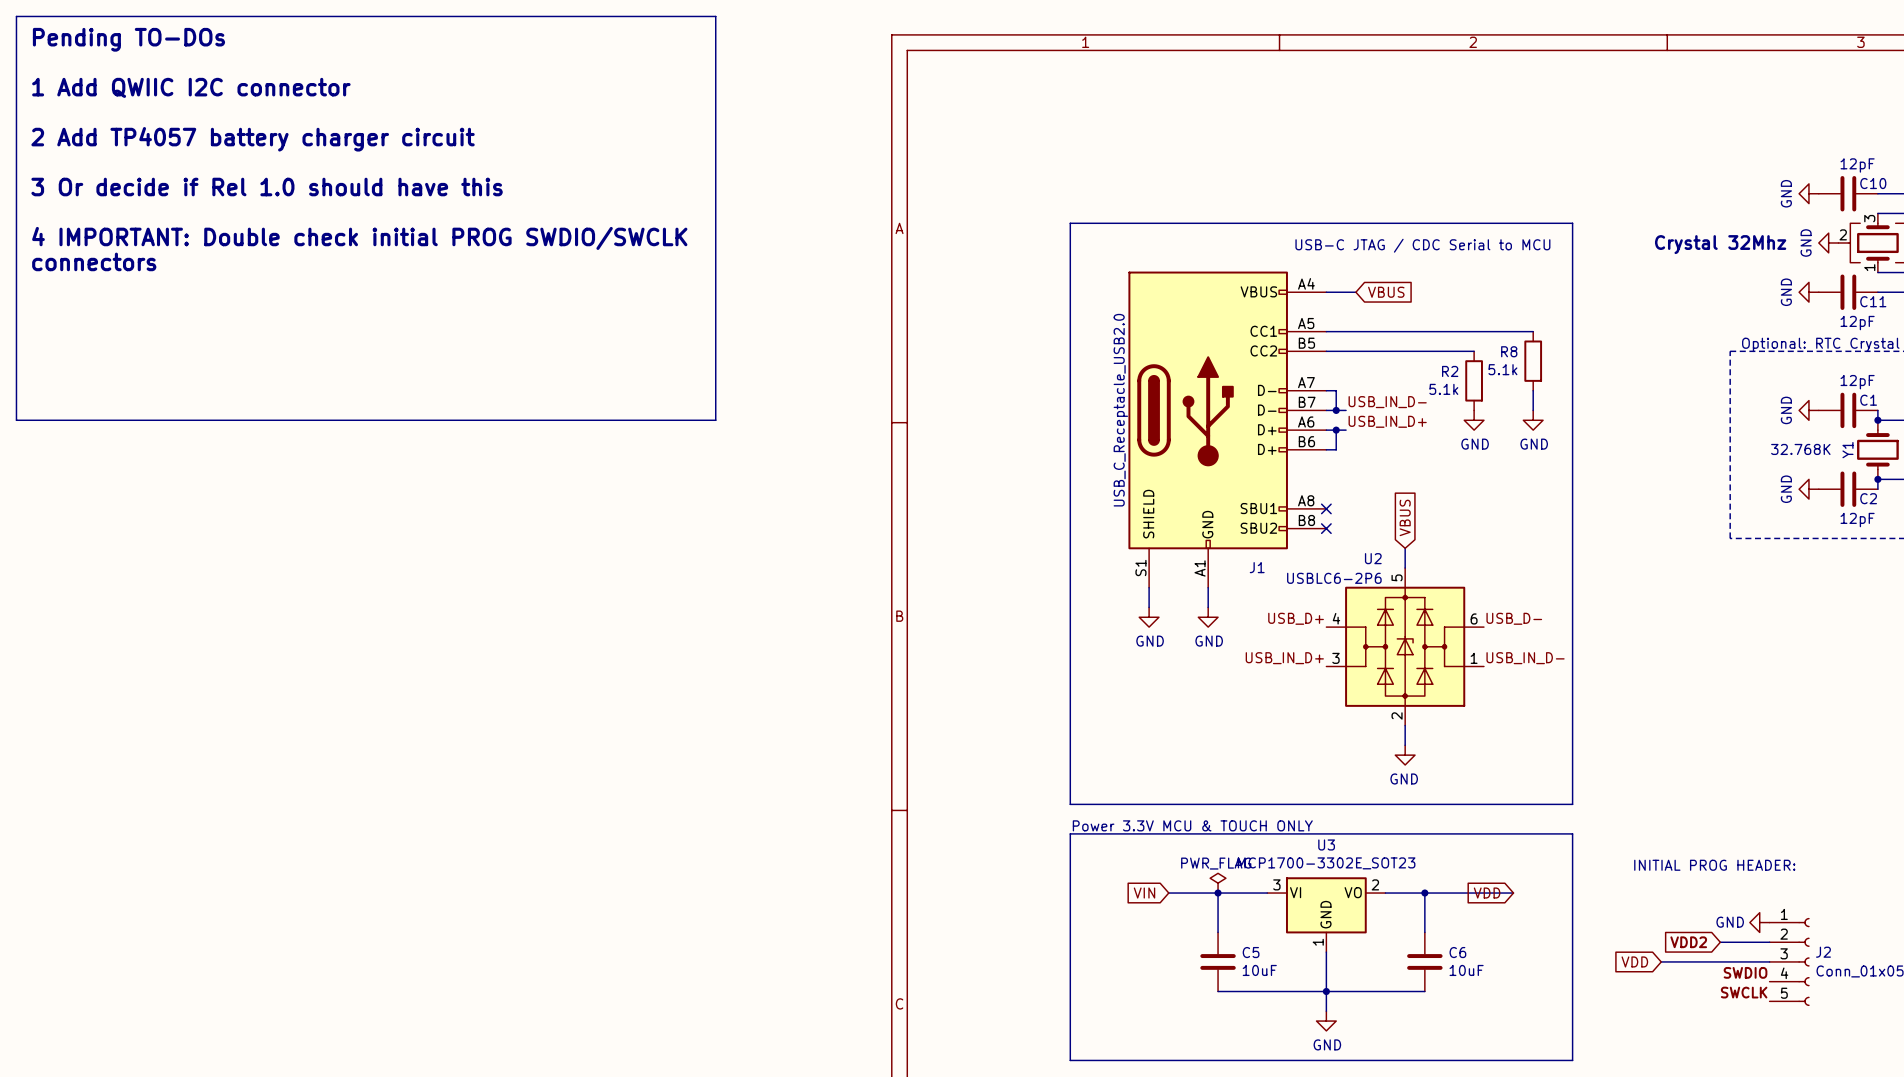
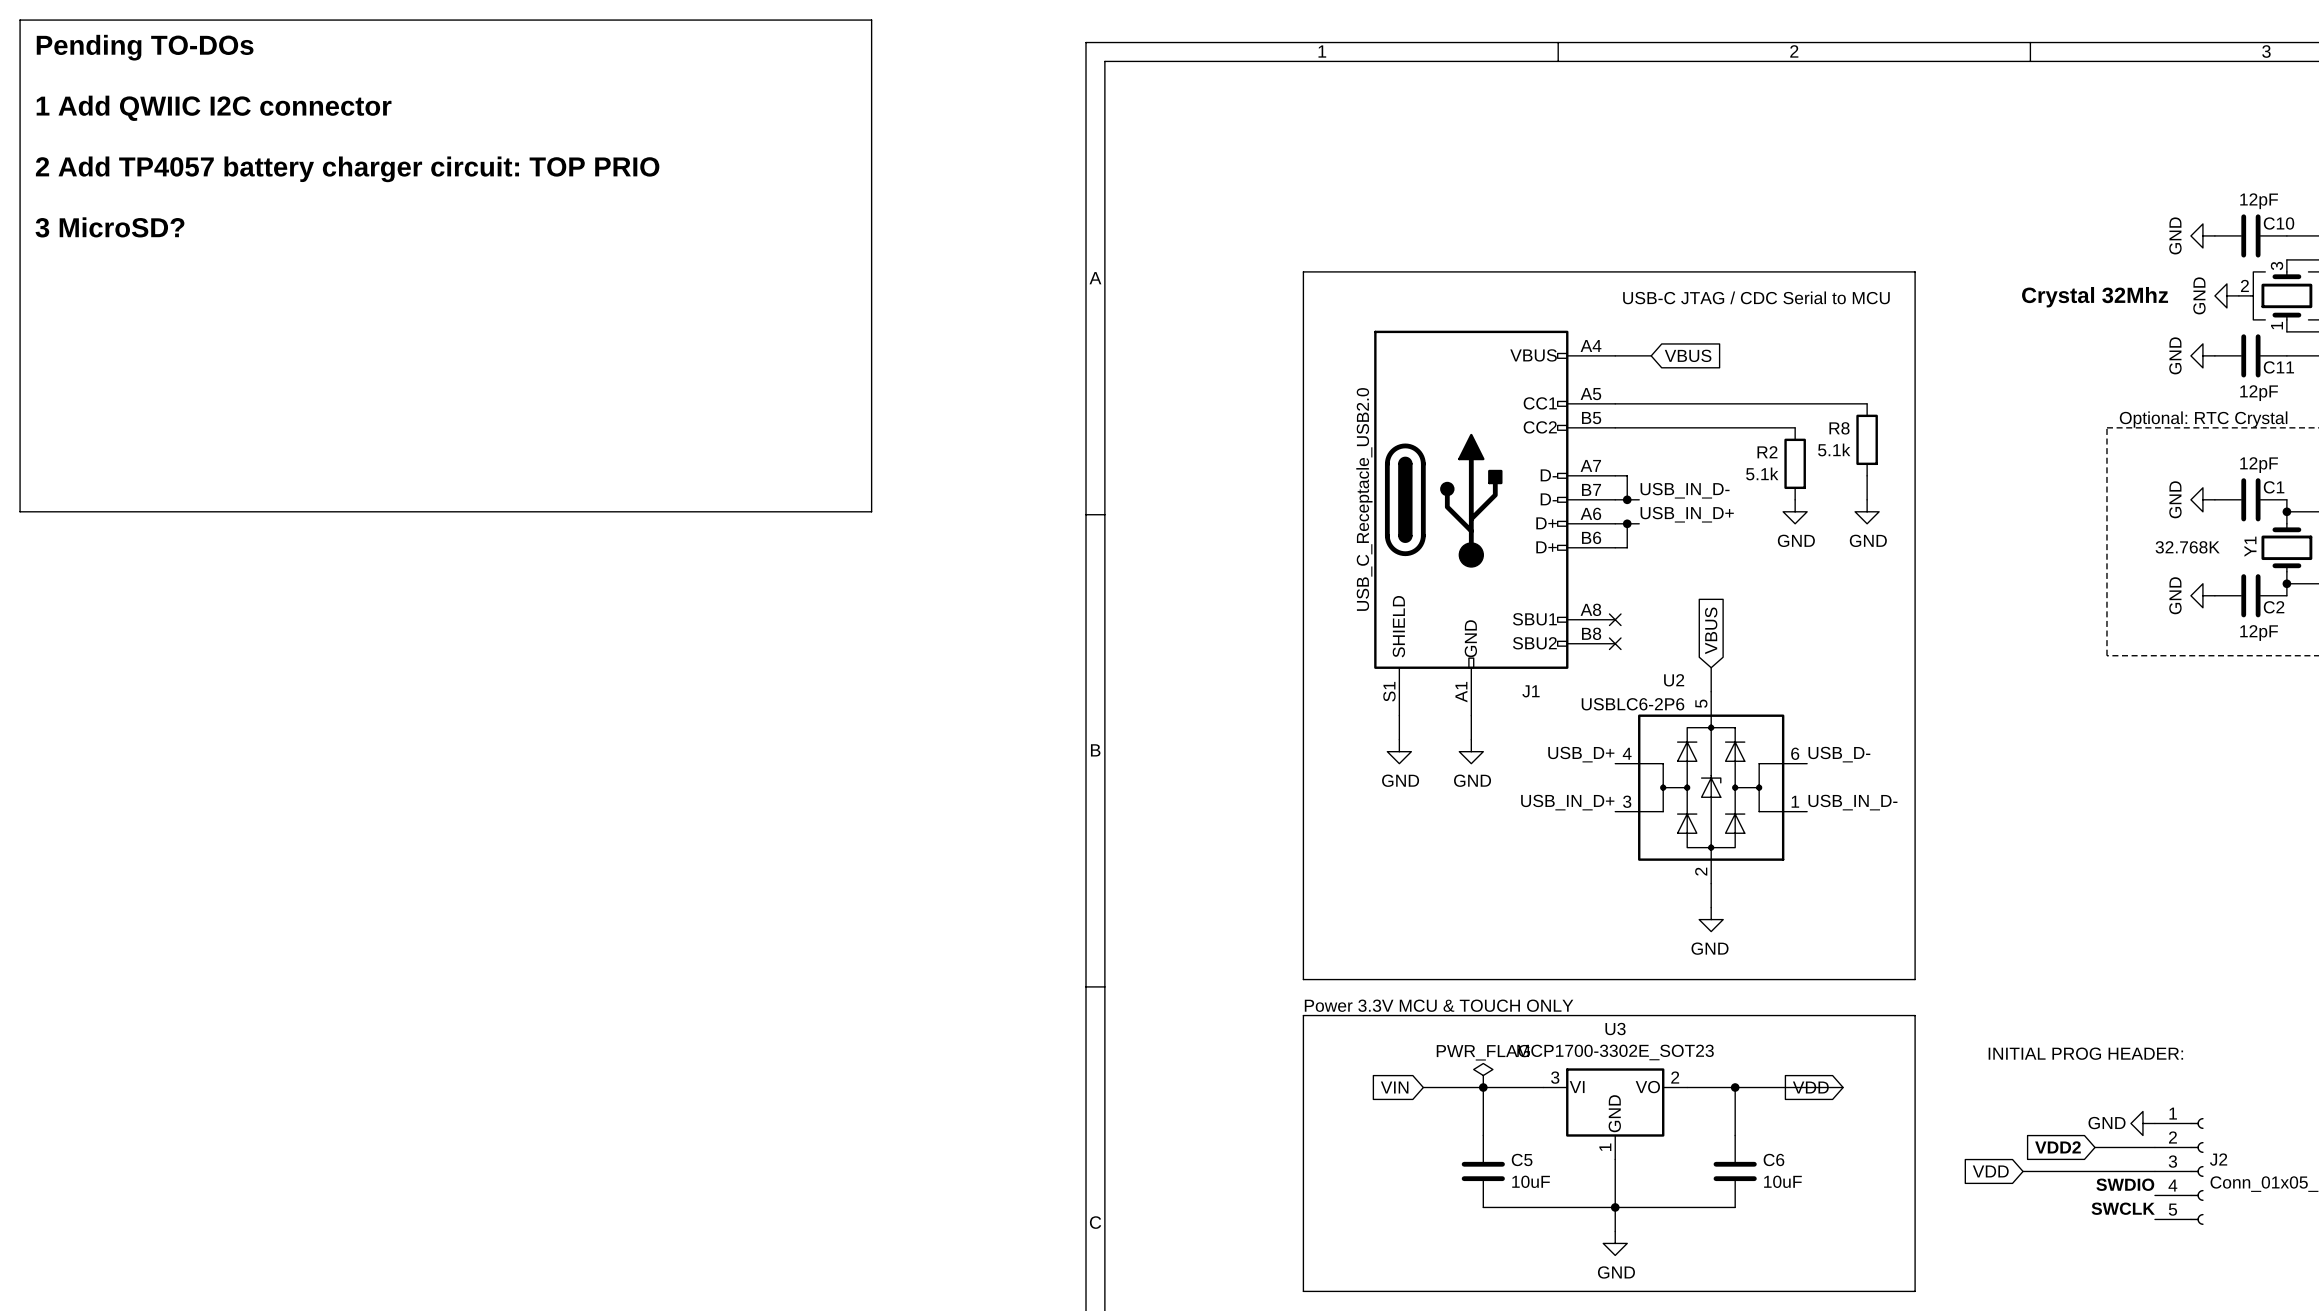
text: 2 Add TP4057 battery charger circuit (253, 139) -> 2 Add TP4057 battery charger circuit: TOP PRIO (347, 169)
text: 3 Or decide if Rel 1.0 should have this (267, 187) -> 3 MicroSD? (109, 227)
text: 4 IMPORTANT: Double check initial PROG SWDIO/SWCLK (359, 238) -> none
text: connectors (94, 261) -> none

